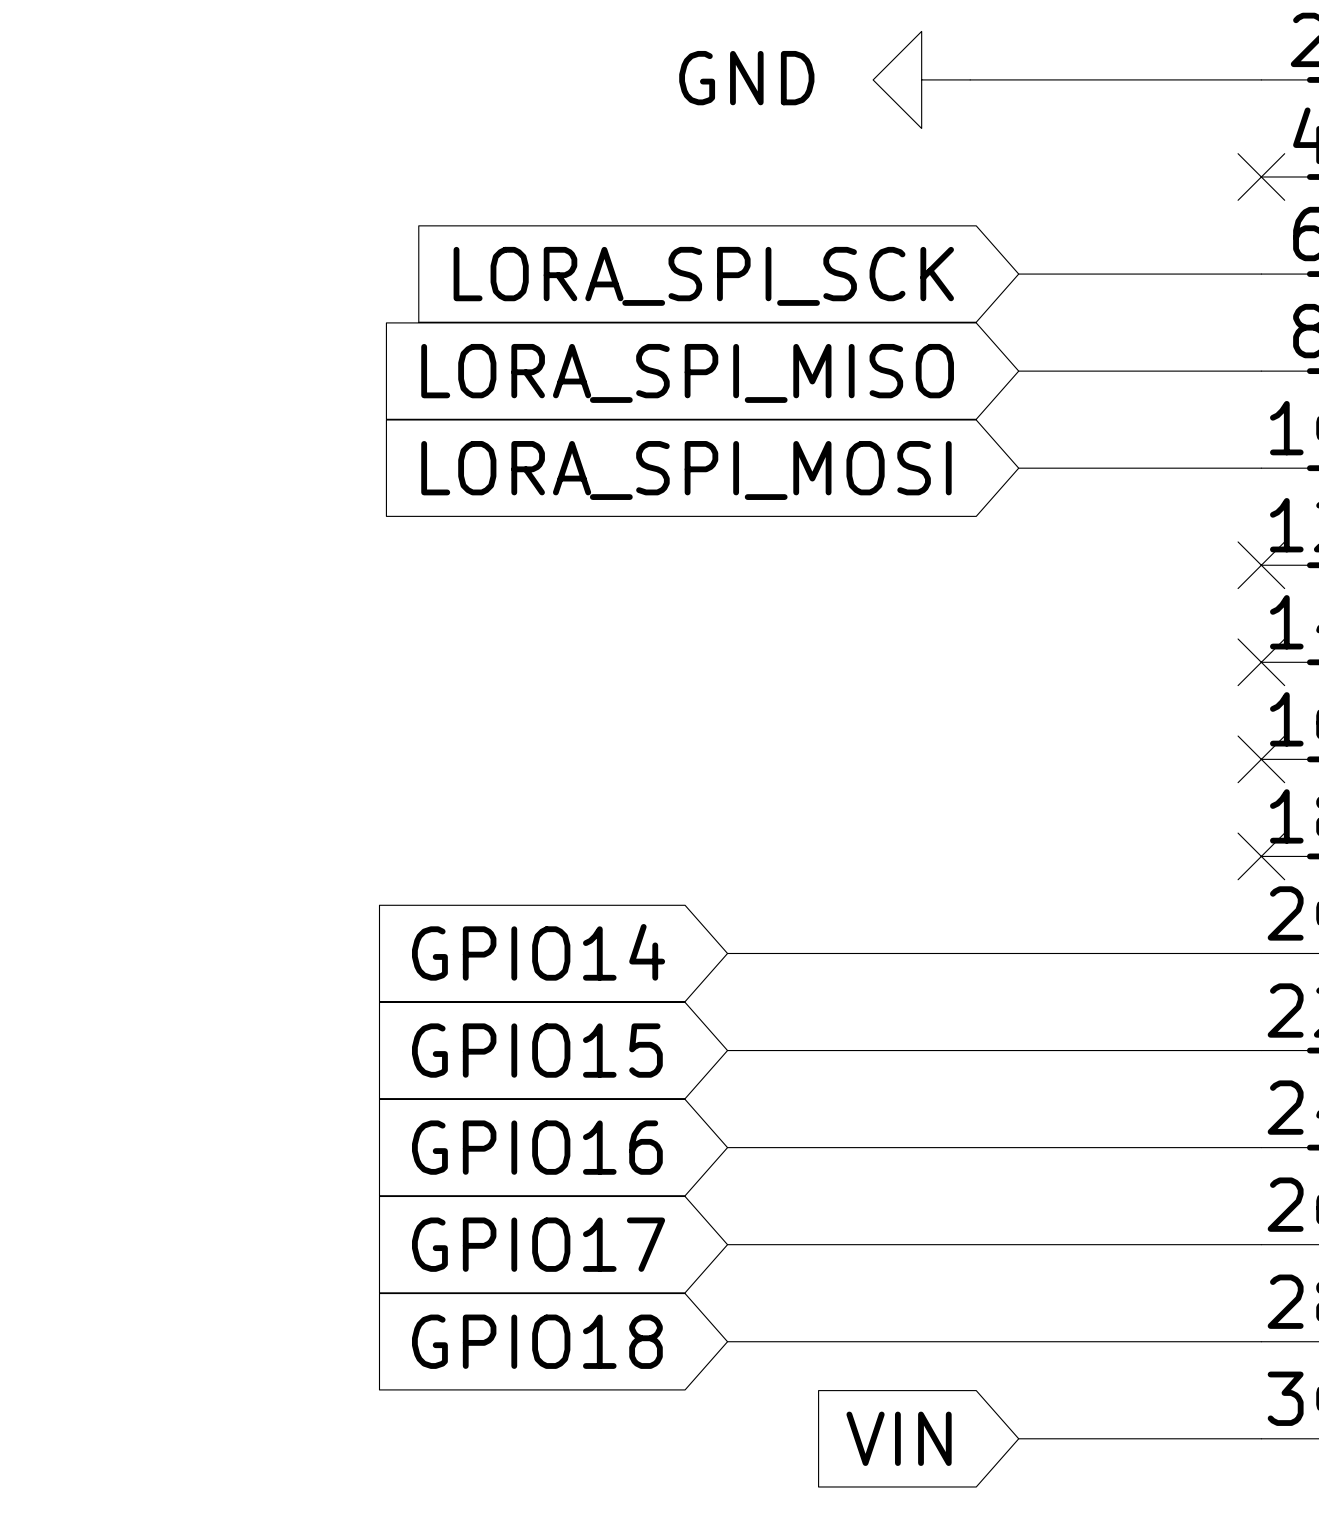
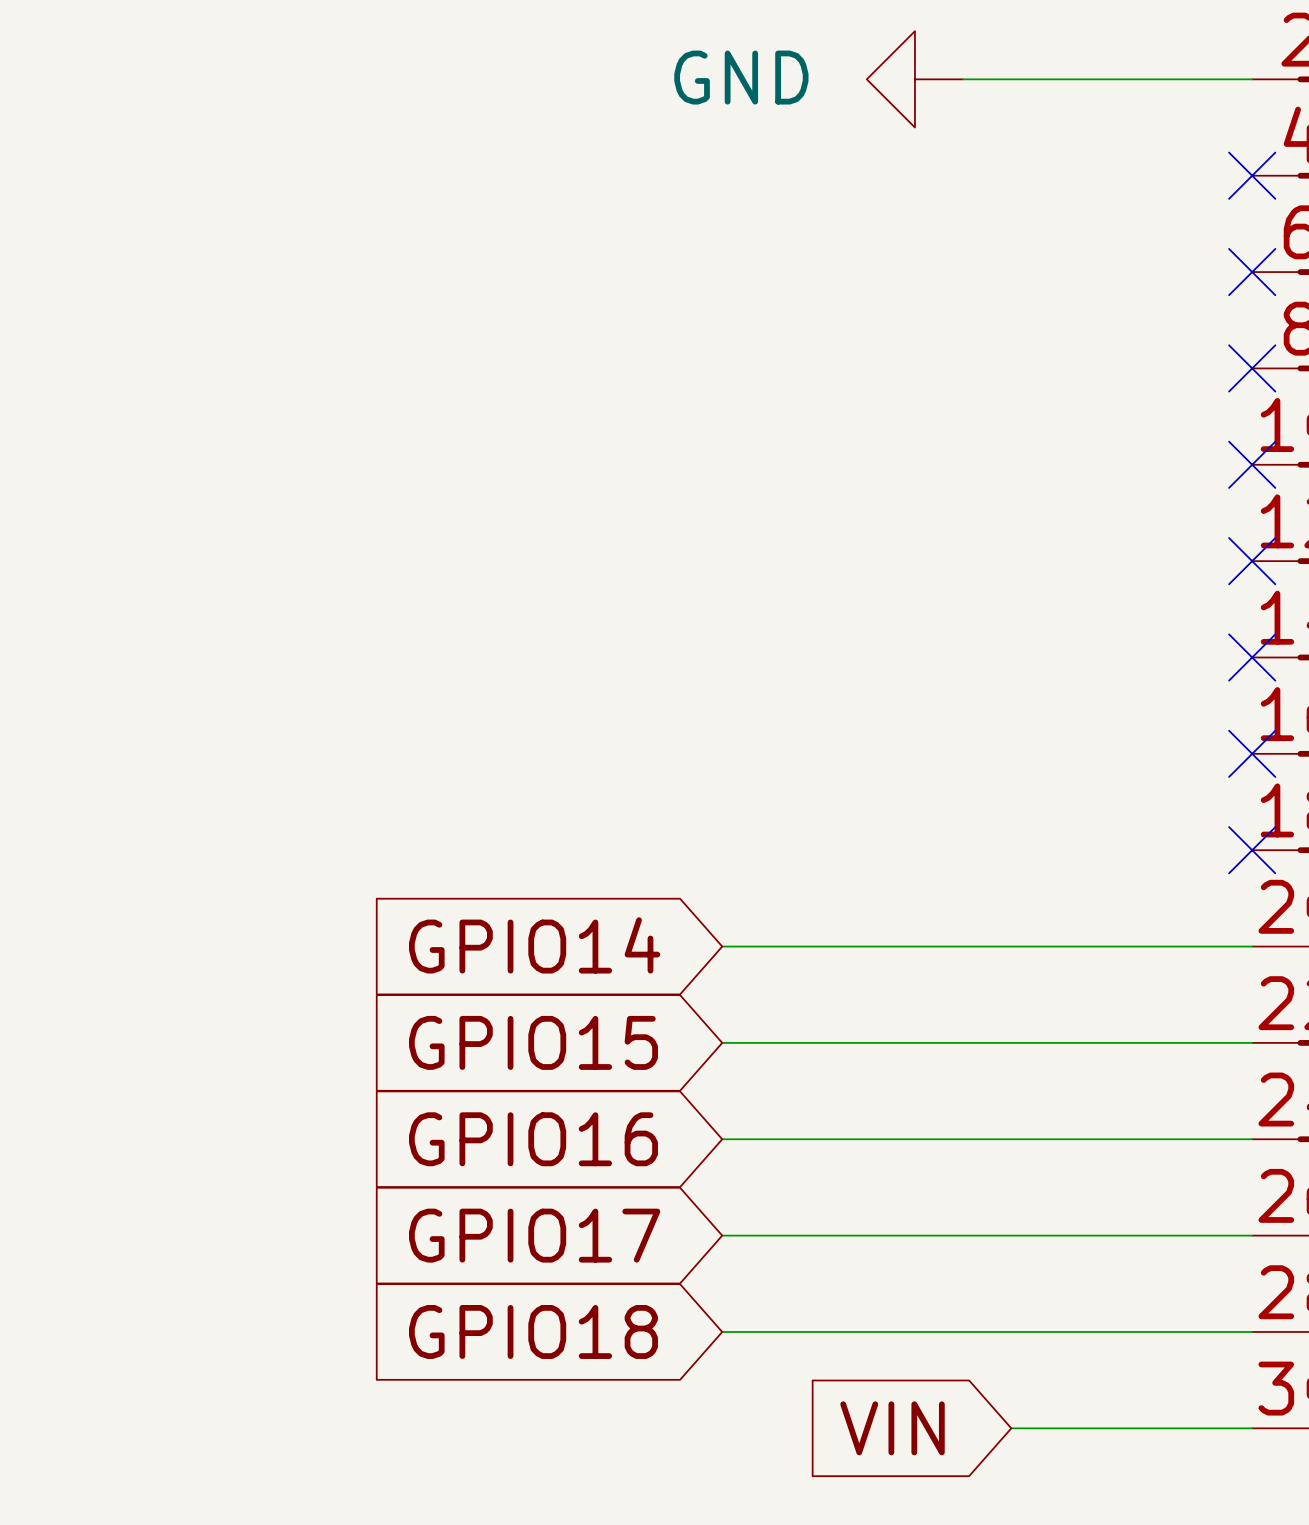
wire: (1018, 274) (1261, 274) -> none
no-connect mark: none -> (1252, 272)
global label: LORA_SPI_SCK (703, 276) -> none
wire: (1018, 371) (1261, 371) -> none
no-connect mark: none -> (1252, 368)
global label: LORA_SPI_MISO (687, 373) -> none
wire: (1018, 468) (1261, 468) -> none
no-connect mark: none -> (1252, 464)
global label: LORA_SPI_MOSI (686, 470) -> none

